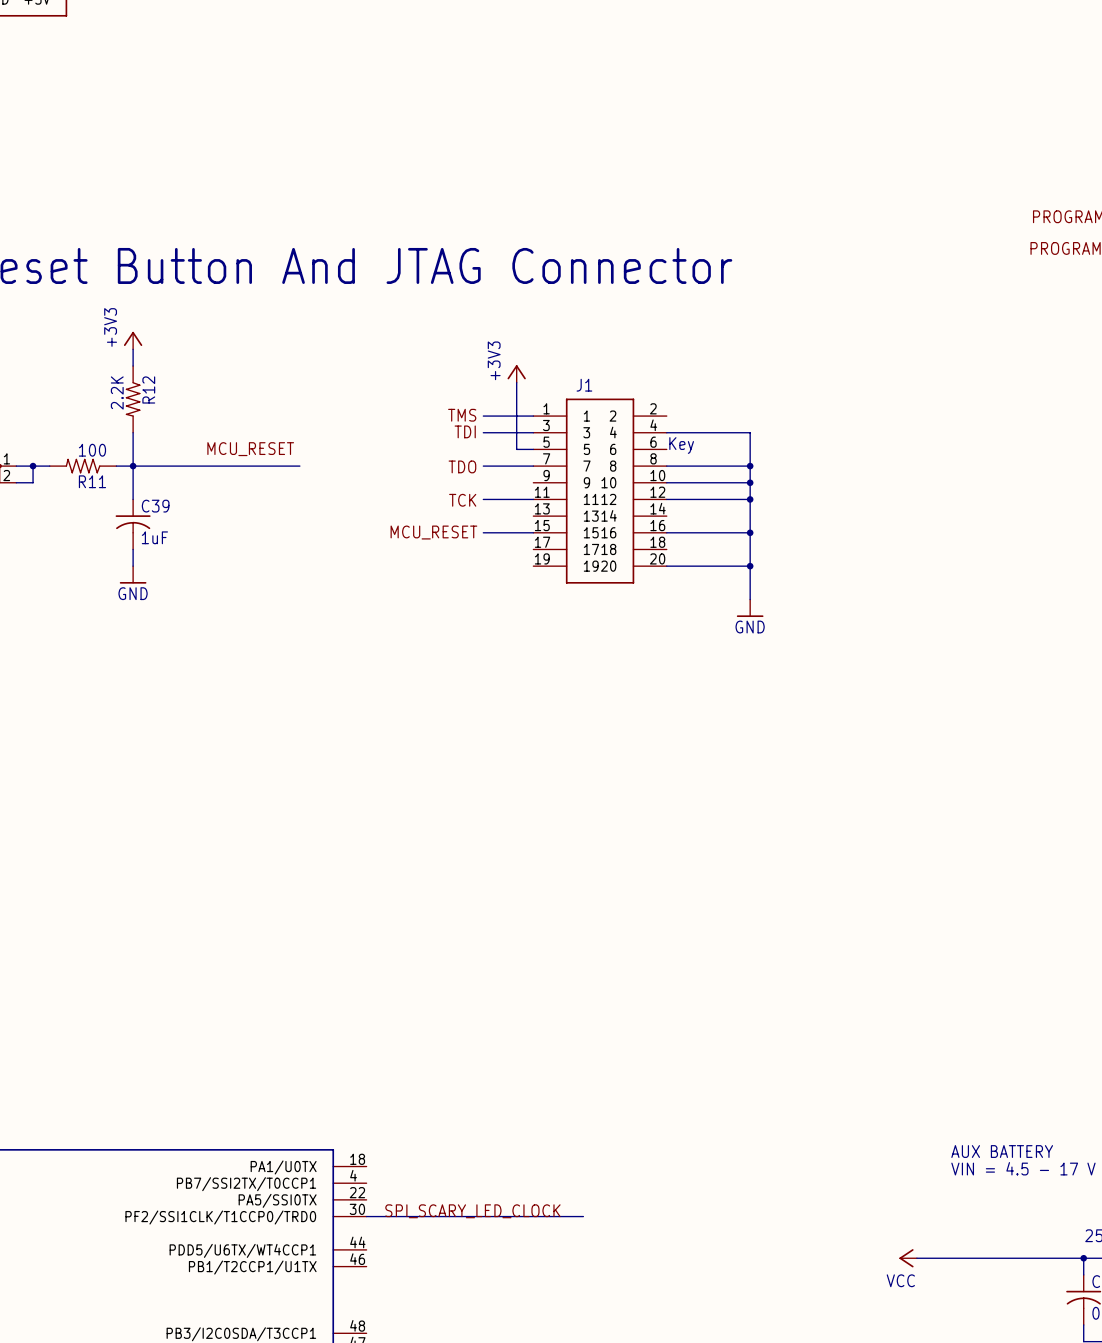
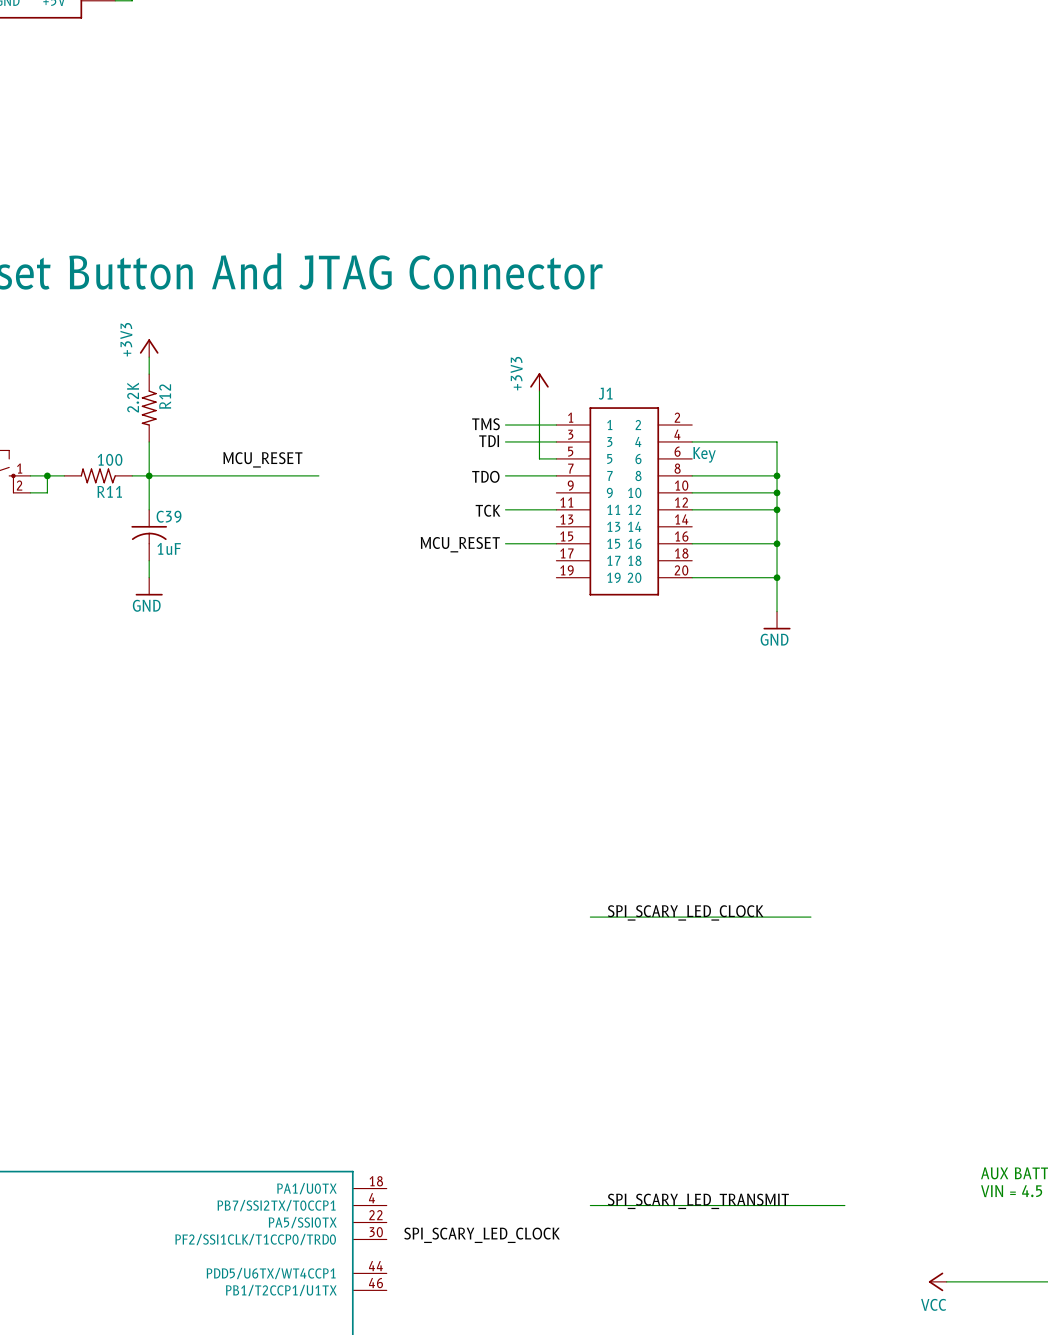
label: none -> SPI_SCARY_LED_CLOCK (685, 912)
wire: none -> (590, 917) (810, 917)
label: none -> SPI_SCARY_LED_TRANSMIT (698, 1201)
wire: none -> (590, 1205) (844, 1205)
wire: (366, 1216) (583, 1216) -> none

